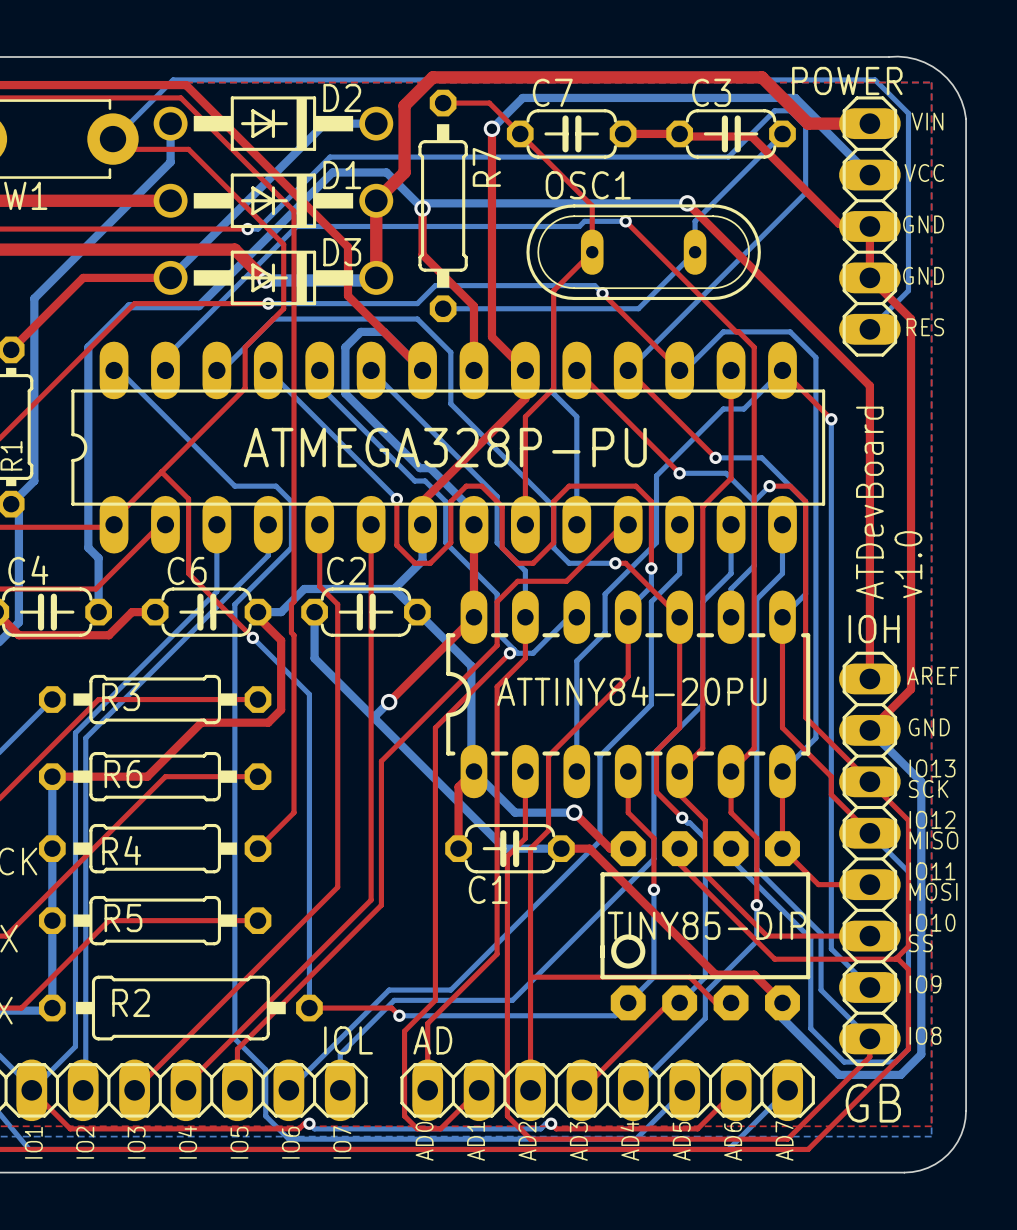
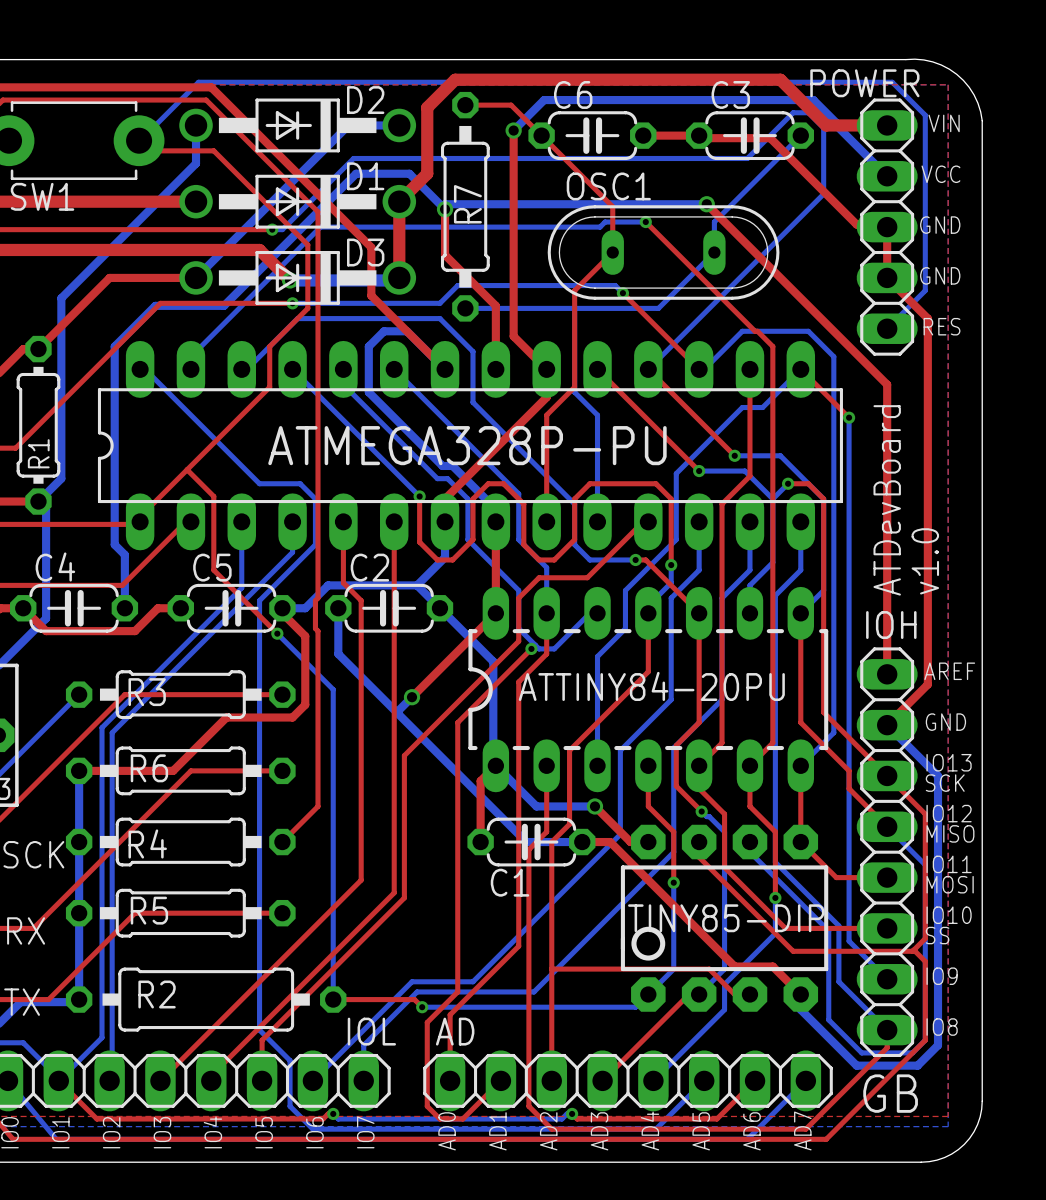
C7 name: C7 (552, 92) -> C6 (573, 94)
R7 name position: R7 (486, 167) -> R7 (467, 204)
C6 name: C6 (187, 570) -> C5 (212, 567)

